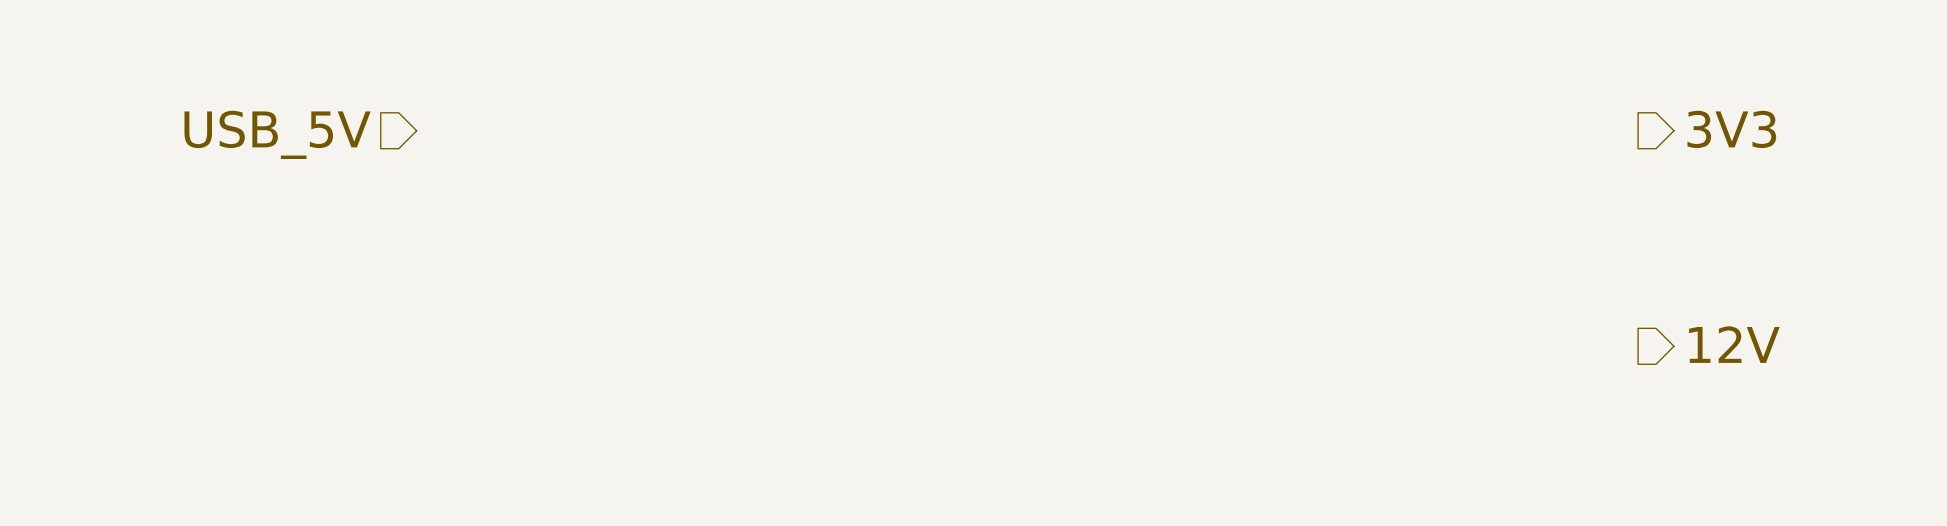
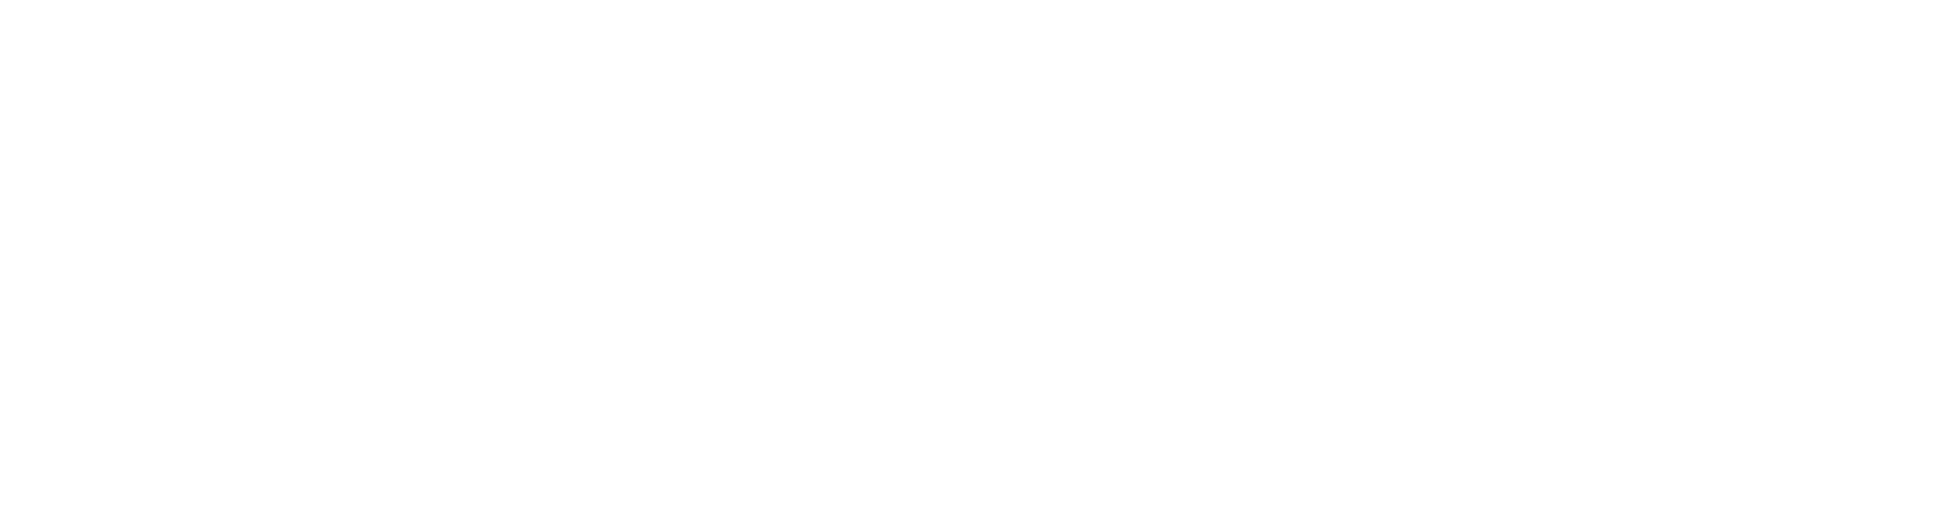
hierarchical label: 3V3 (1731, 129) -> none
hierarchical label: USB_5V (277, 134) -> none
hierarchical label: 12V (1734, 344) -> none

